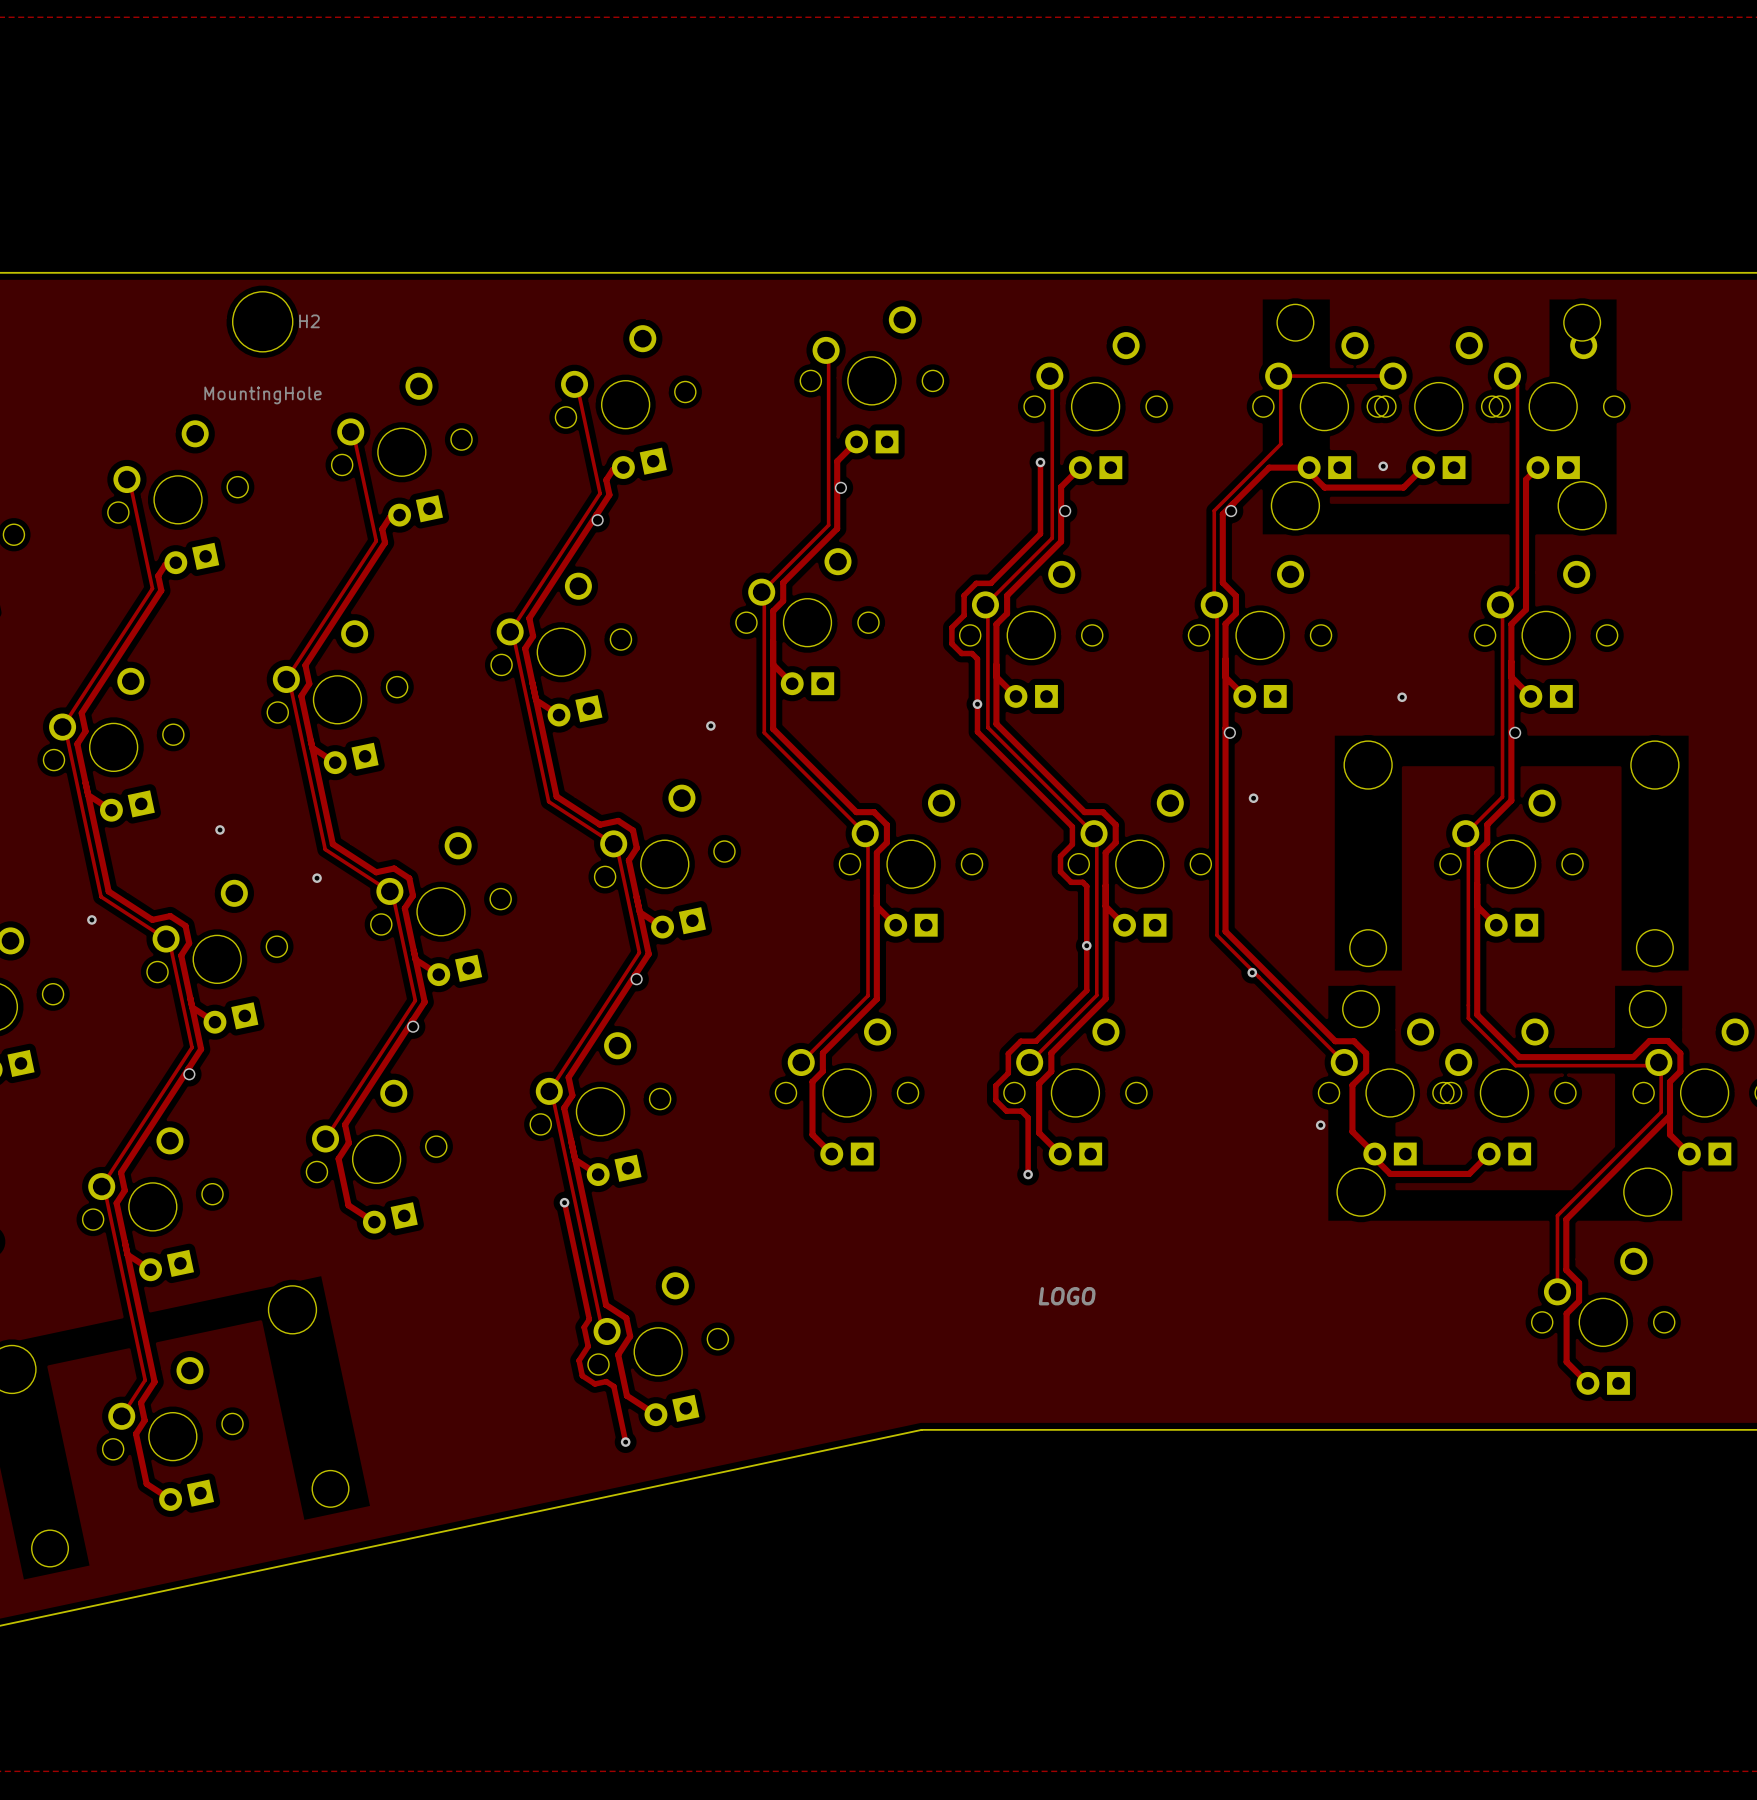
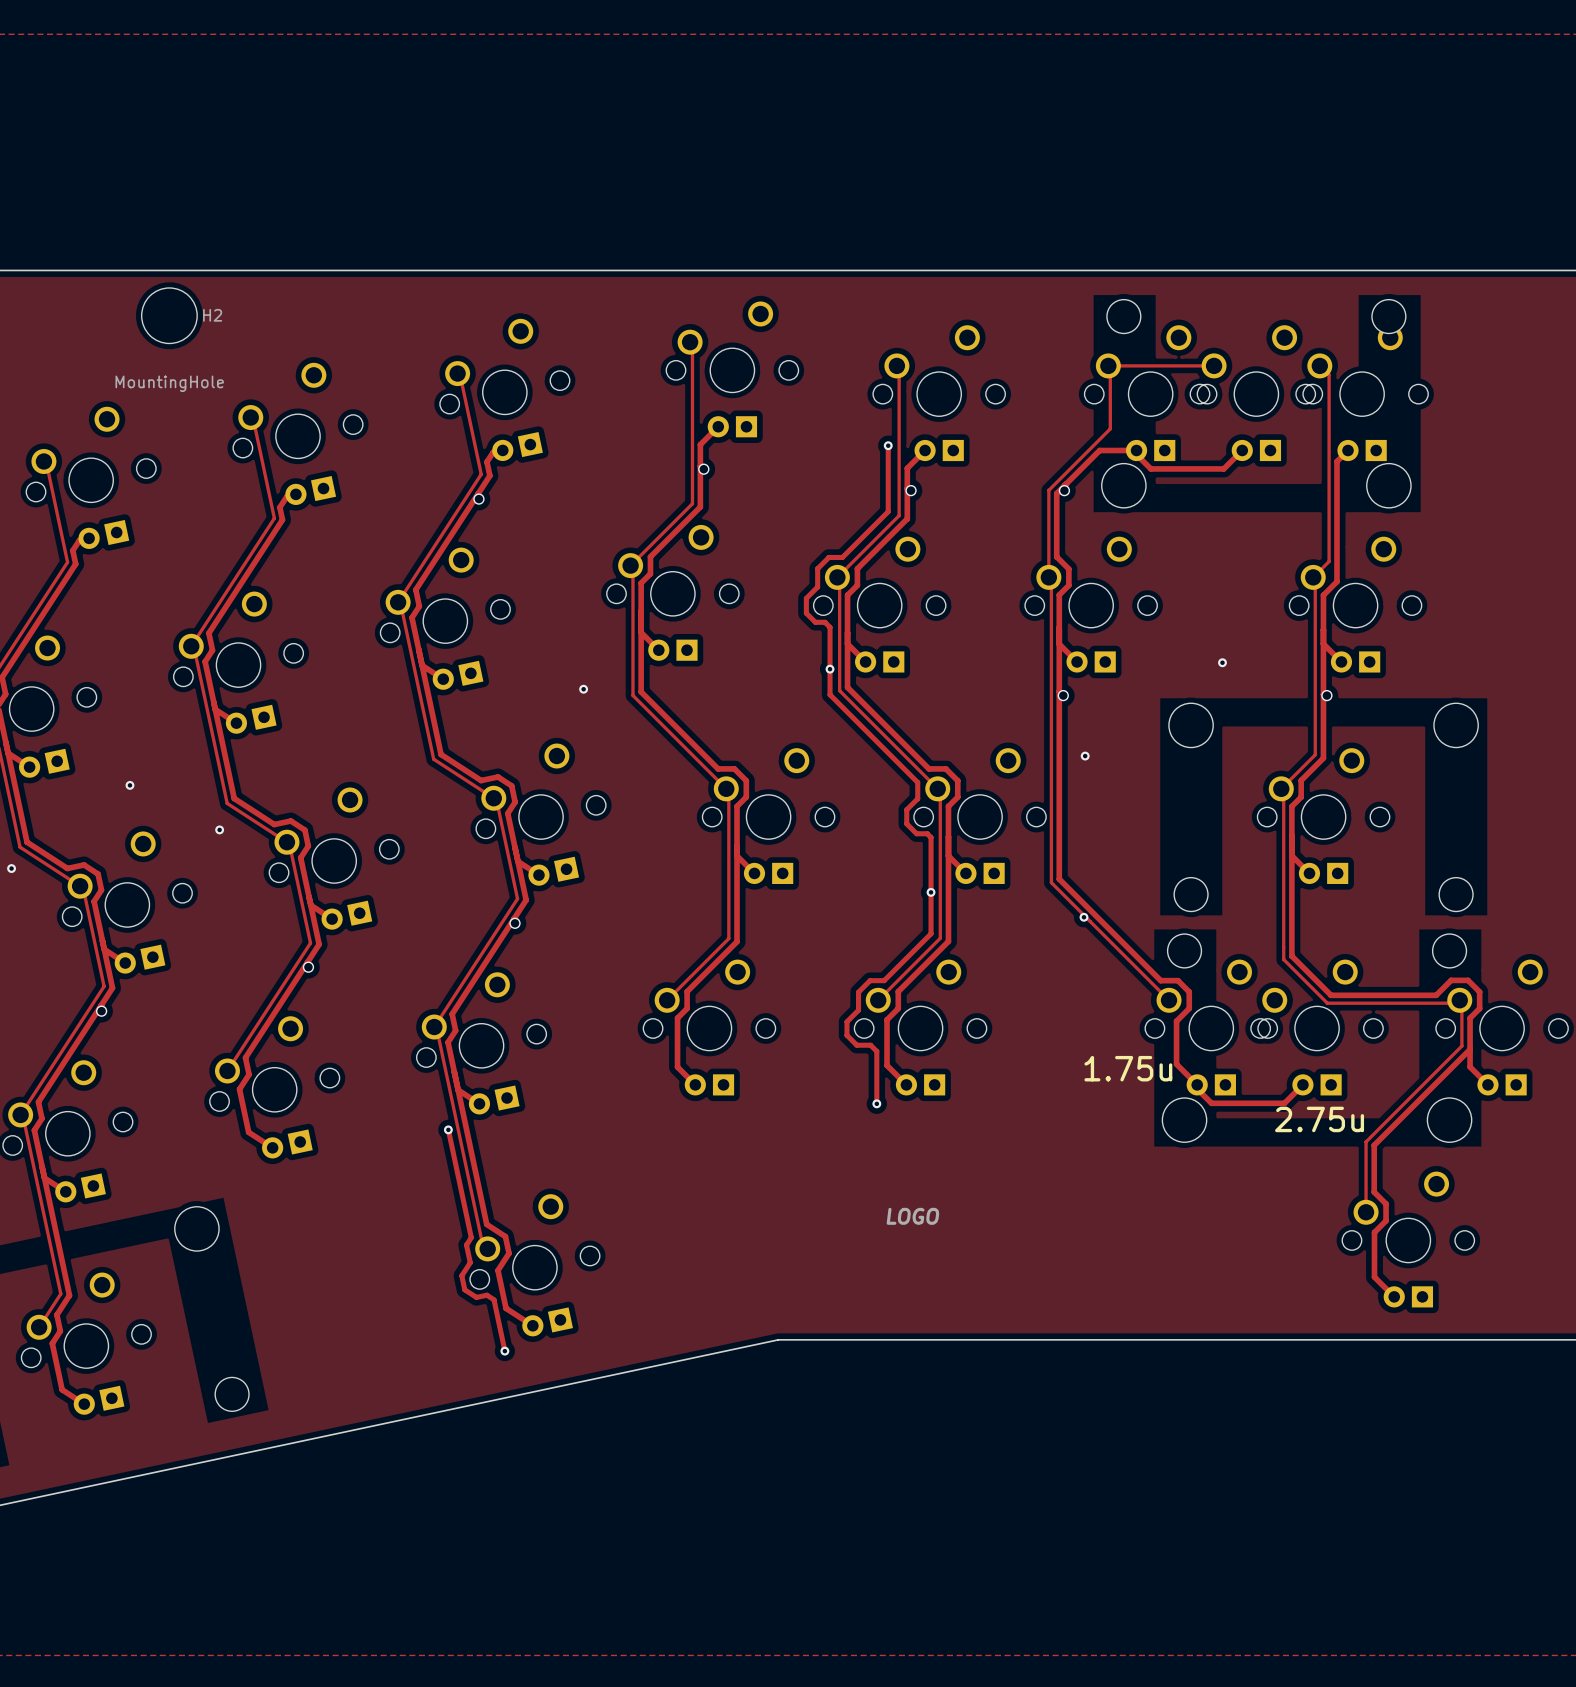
via: (1383, 466) -> none
via: (1320, 1125) -> none
text: none -> 1.75u (1128, 1068)
text: none -> 2.75u (1319, 1119)

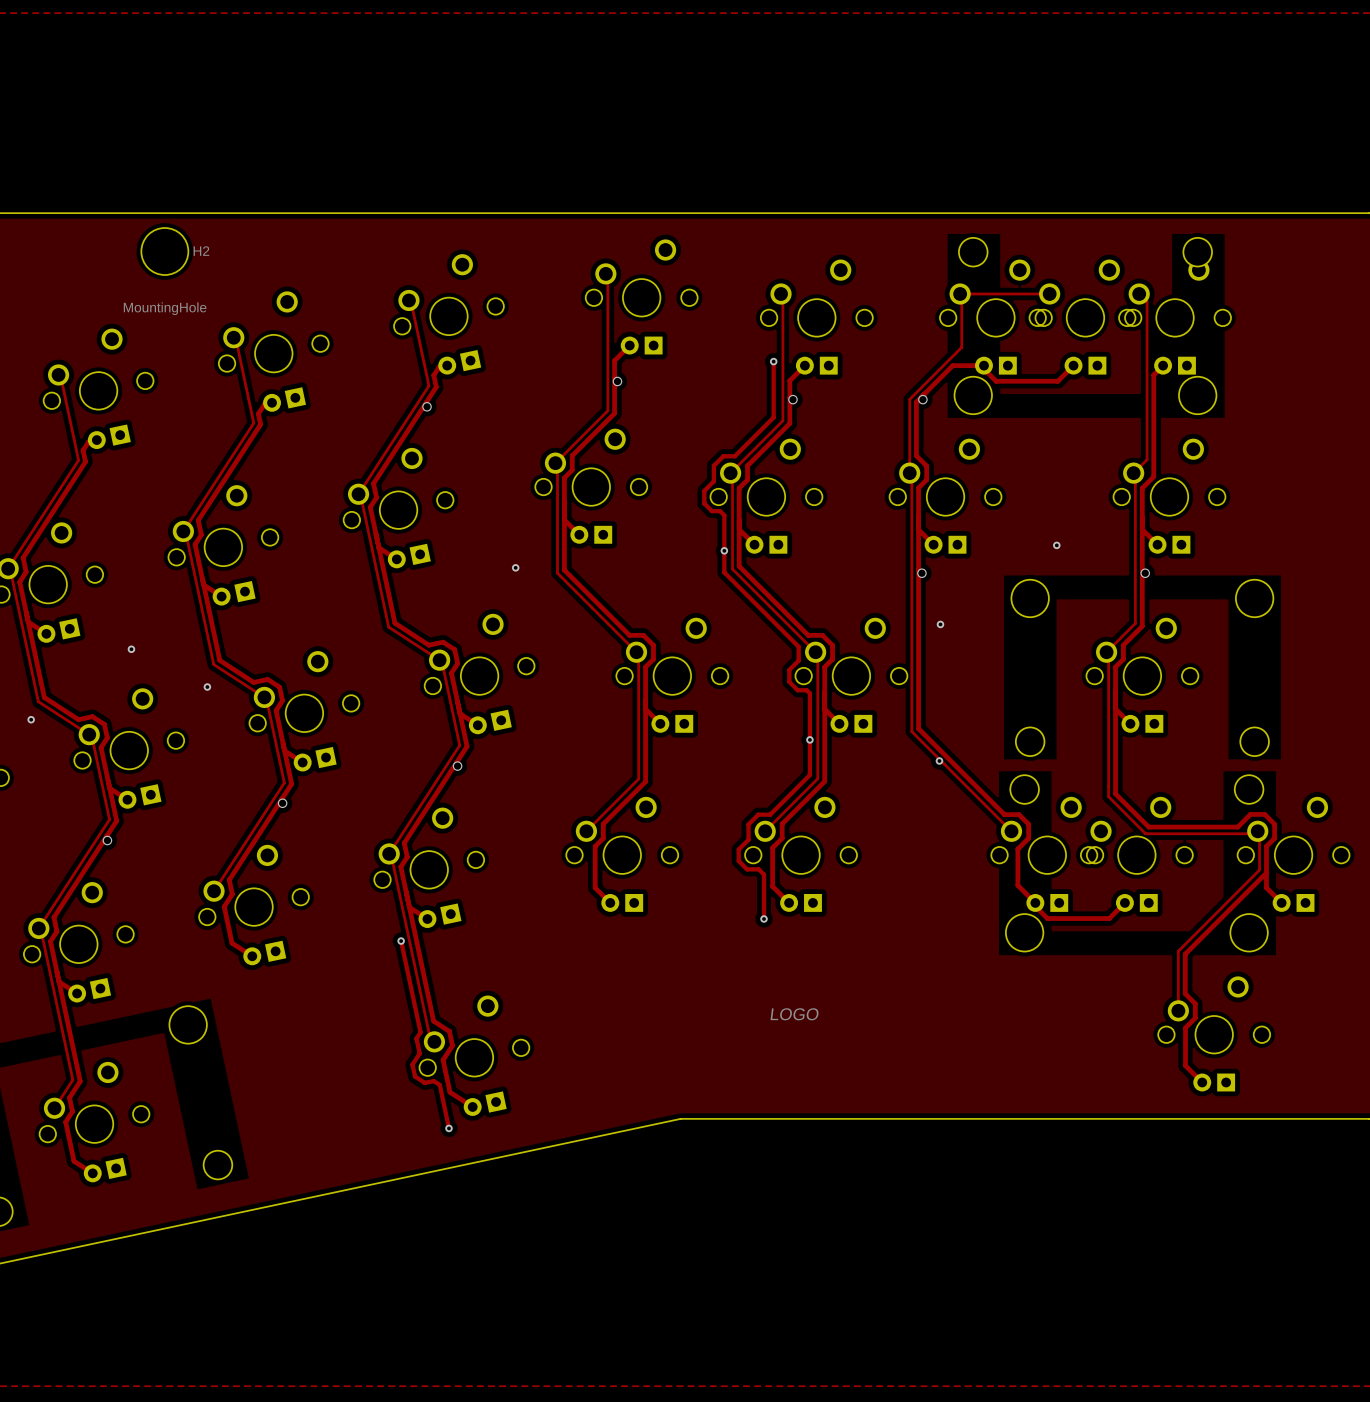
text: 1.75u (1128, 1068) -> none
text: 2.75u (1319, 1119) -> none

